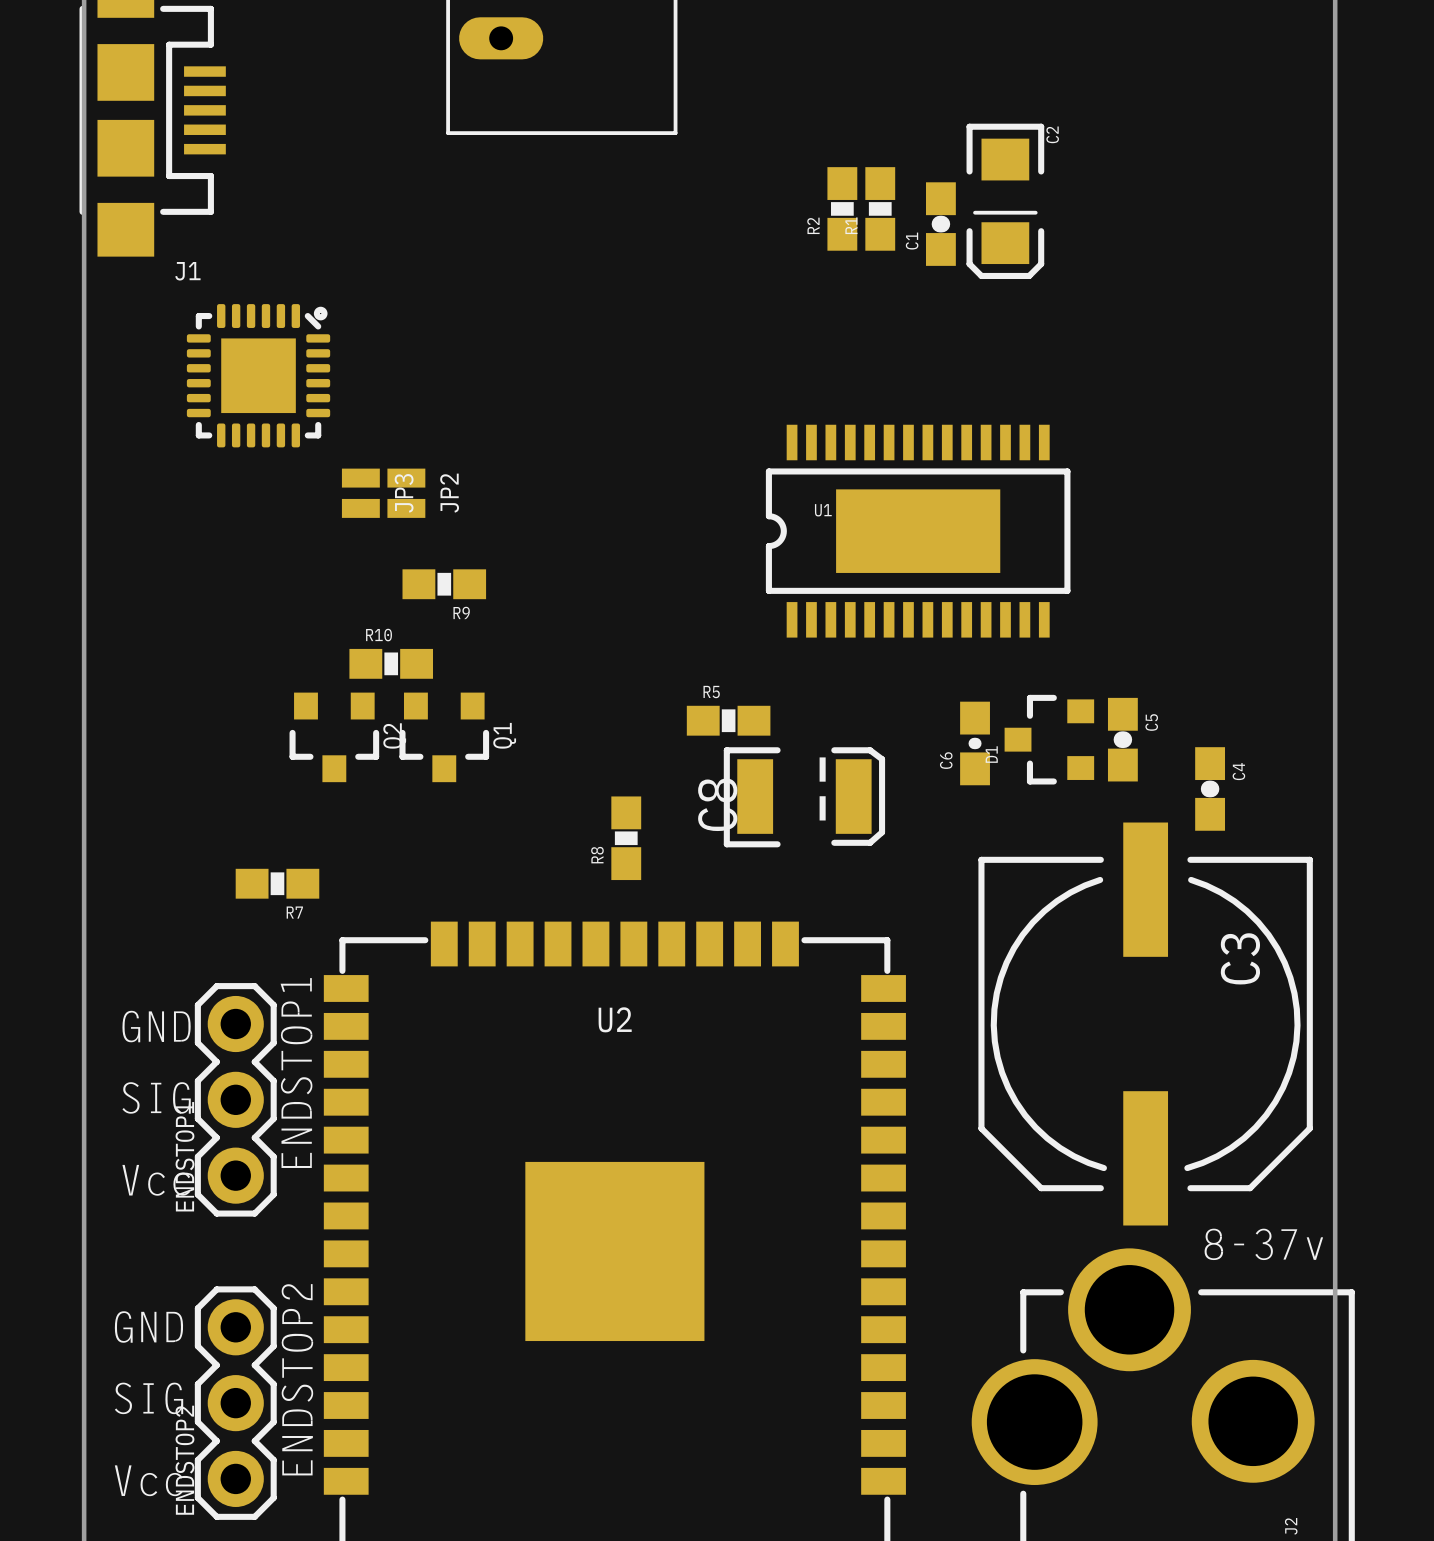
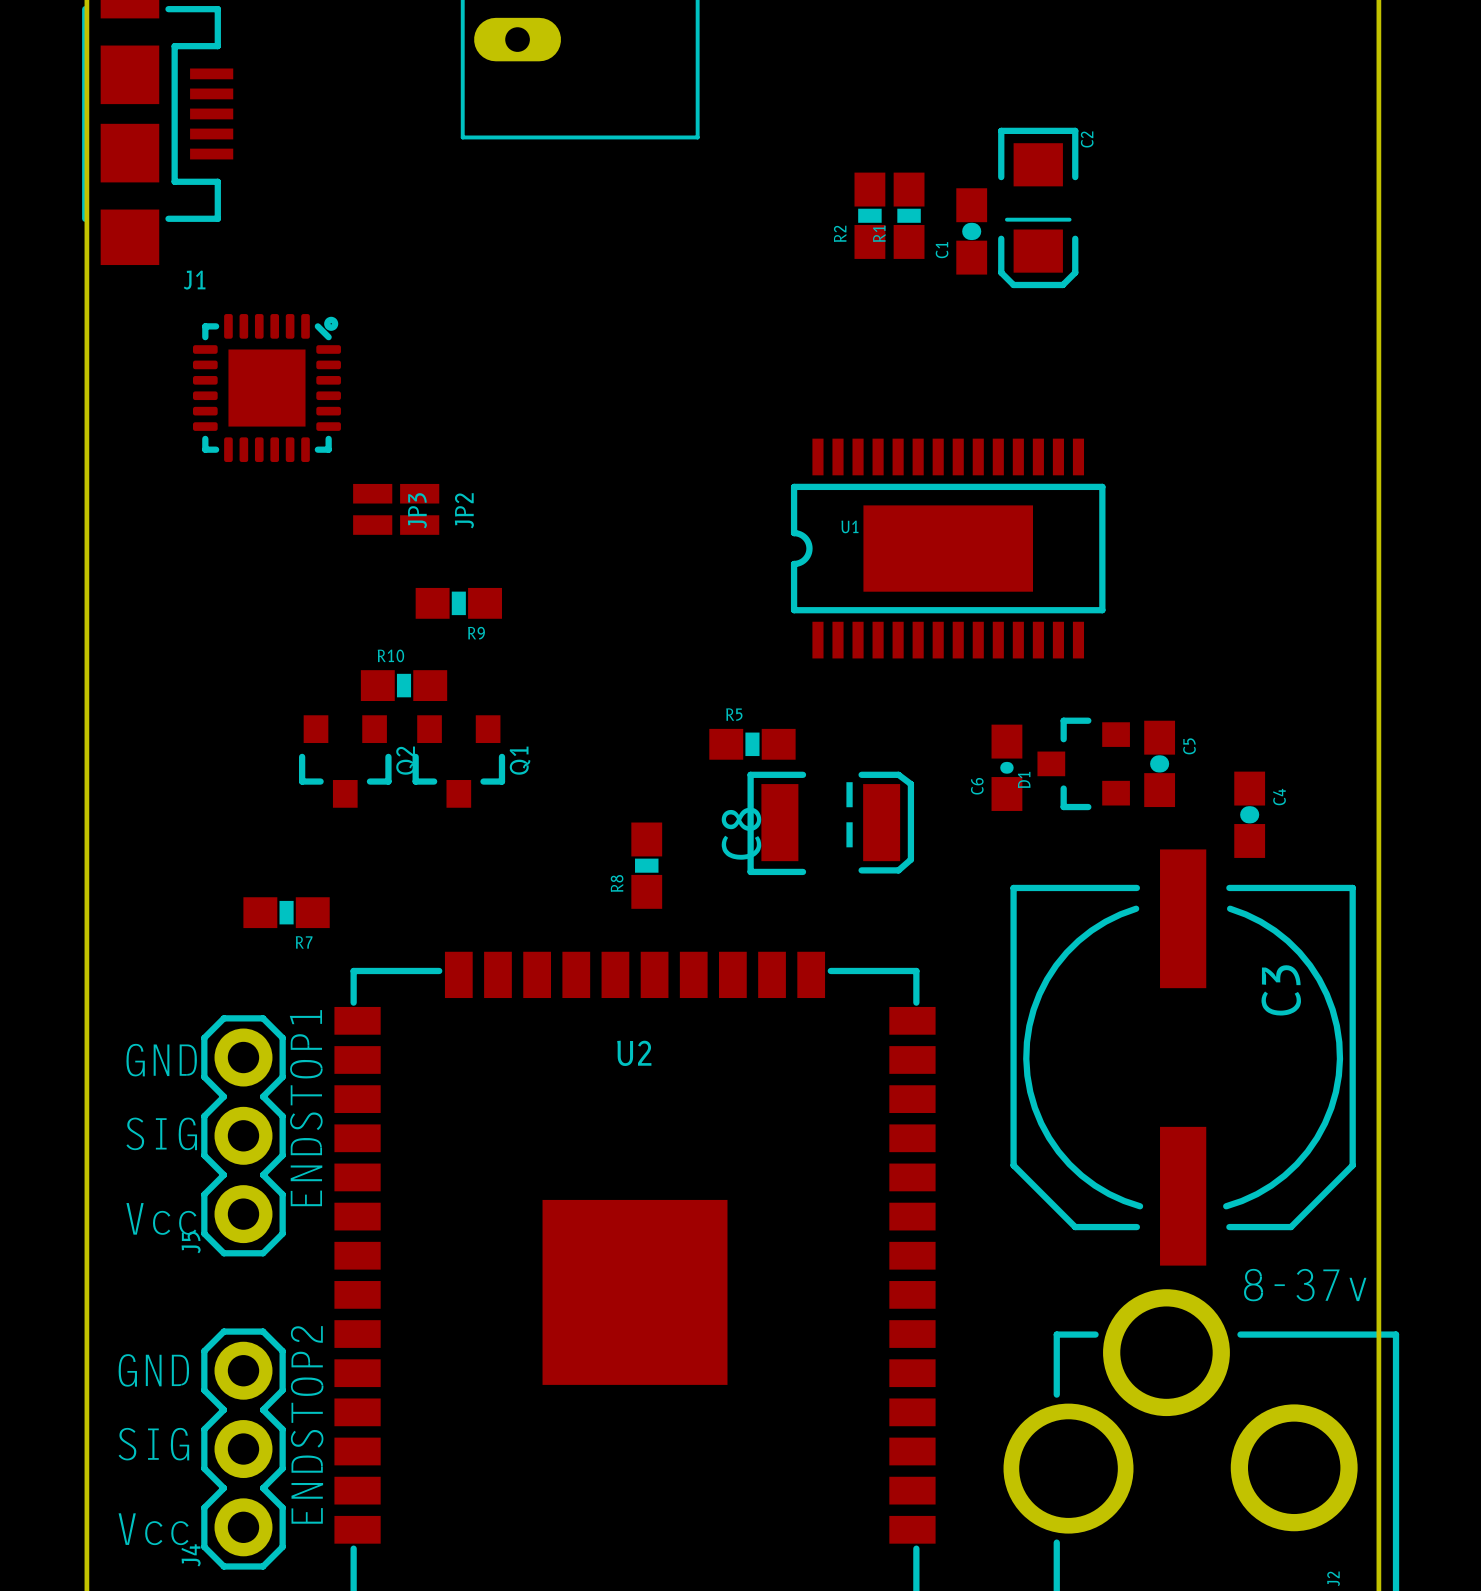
ENDSTOP1 name: ENDSTOP1 (184, 1156) -> J5 (191, 1242)
ENDSTOP2 name: ENDSTOP2 (184, 1460) -> J4 (191, 1555)

